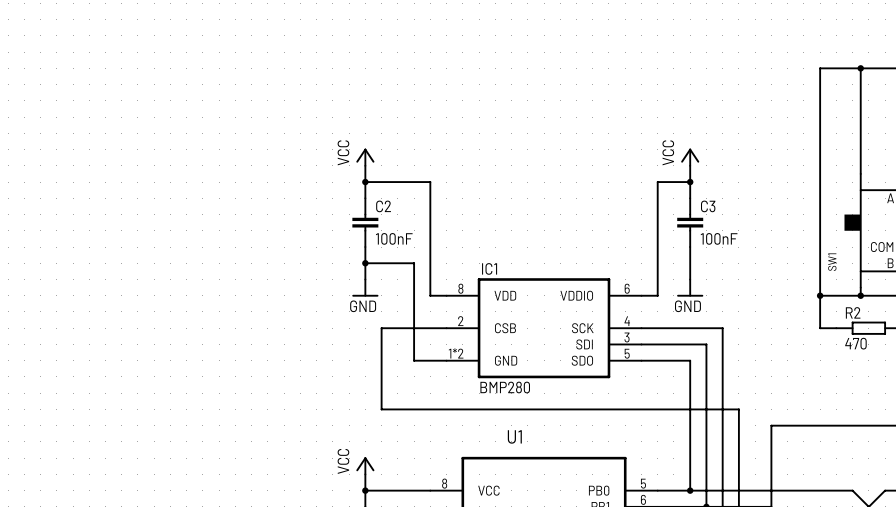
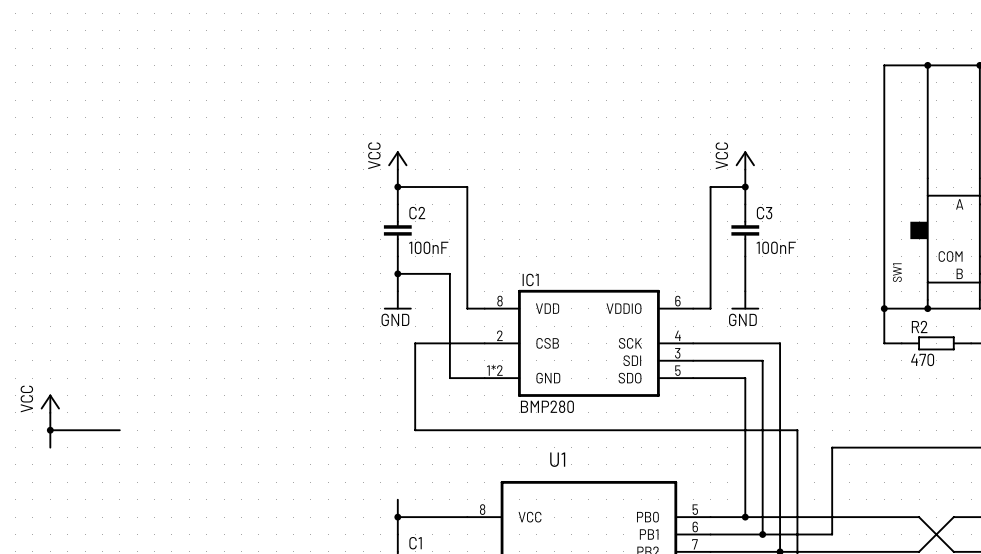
power symbol: none -> VCC (50, 403)
wire: none -> (50, 412) (50, 447)
wire: none -> (50, 430) (119, 430)
junction: none -> (50, 430)
power symbol: VCC (365, 465) -> none

